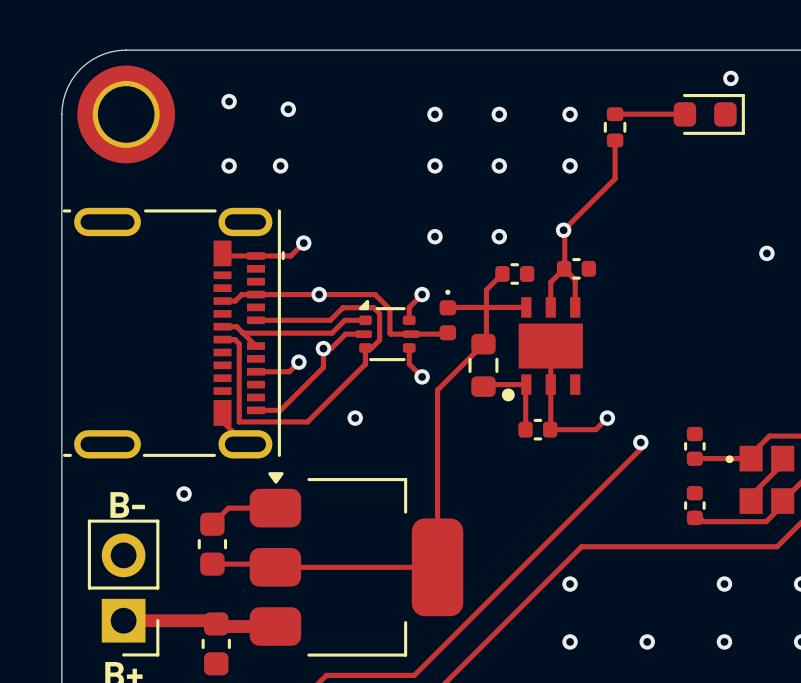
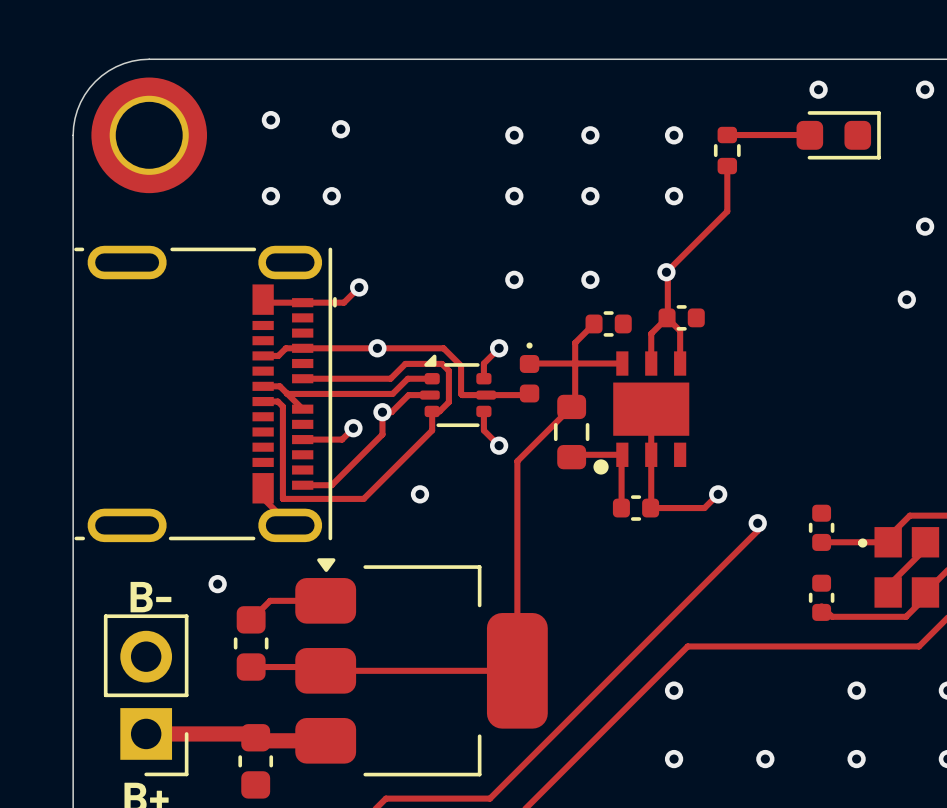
via: none -> (818, 89)
via: none -> (925, 89)
via: (730, 78) -> none
via: none -> (925, 226)

